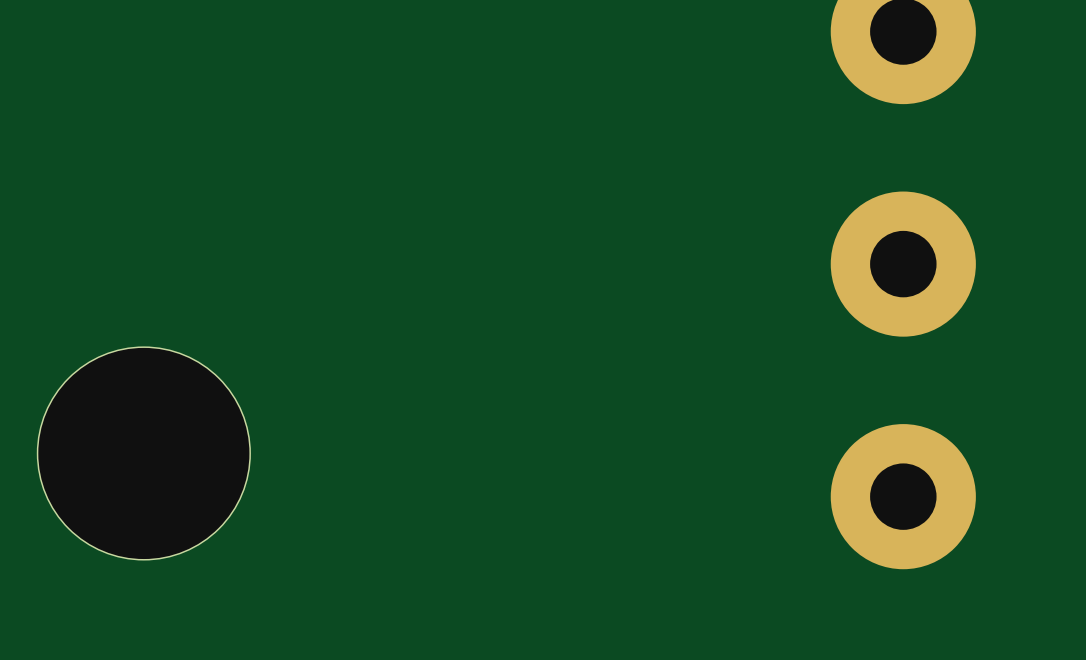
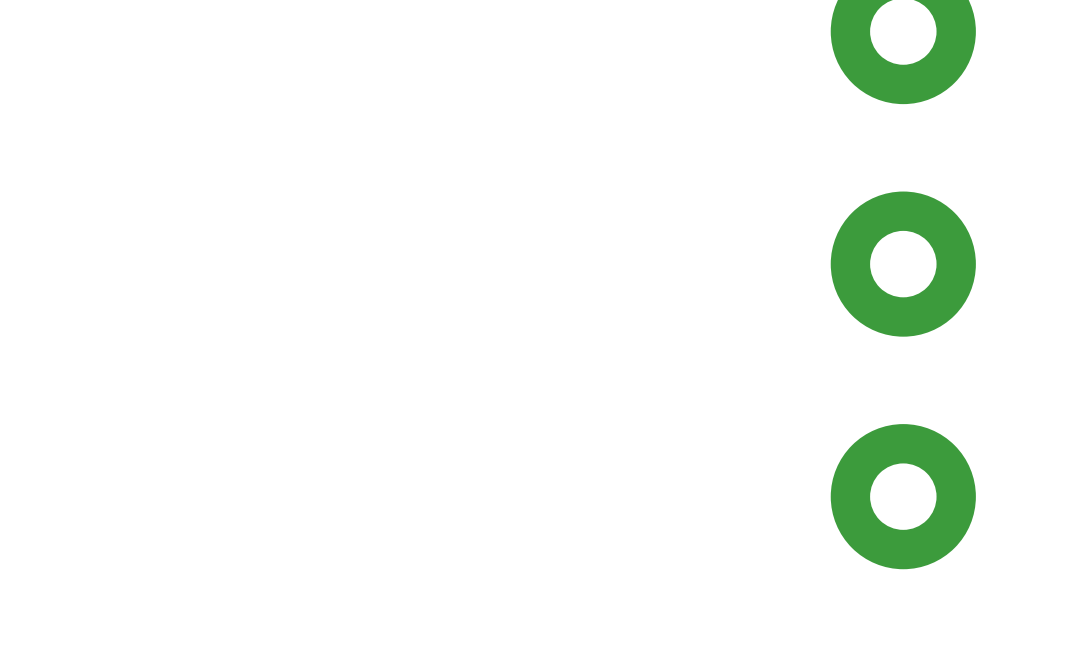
hole: (143, 453) -> none

